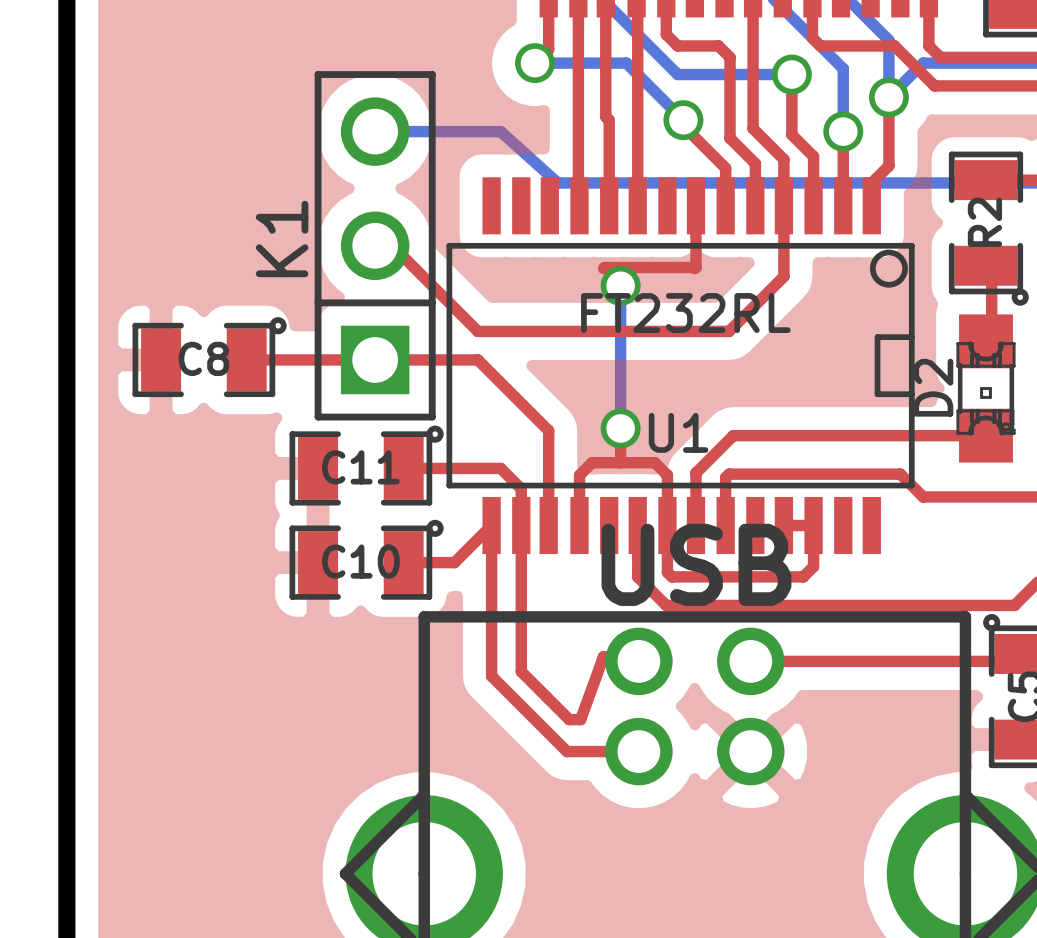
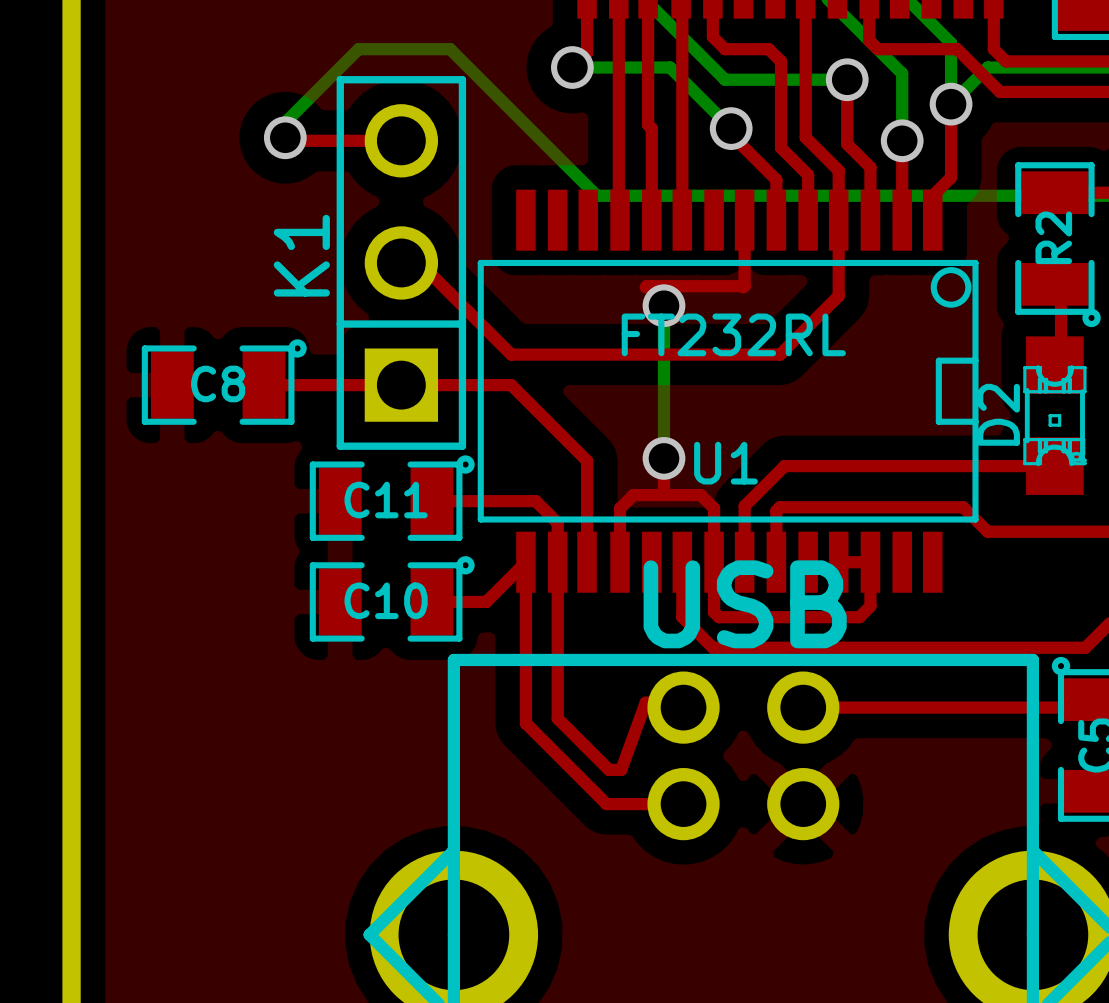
top track: none -> (285, 137) (291, 140) (401, 140)
via: none -> (285, 137)
bottom track: (375, 131) (500, 131) (557, 182) -> (285, 137) (285, 122) (358, 49) (450, 49) (596, 195)

